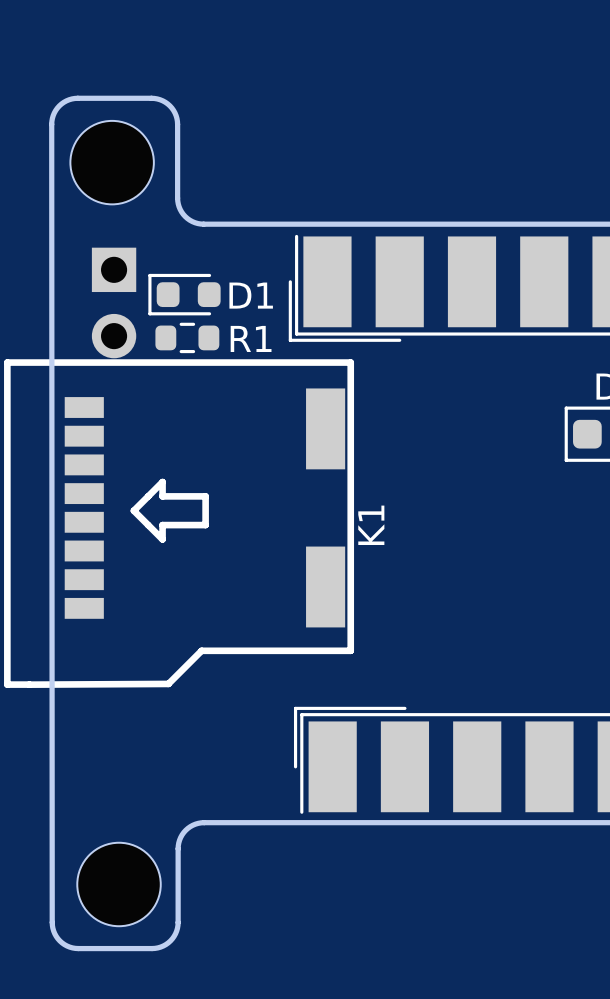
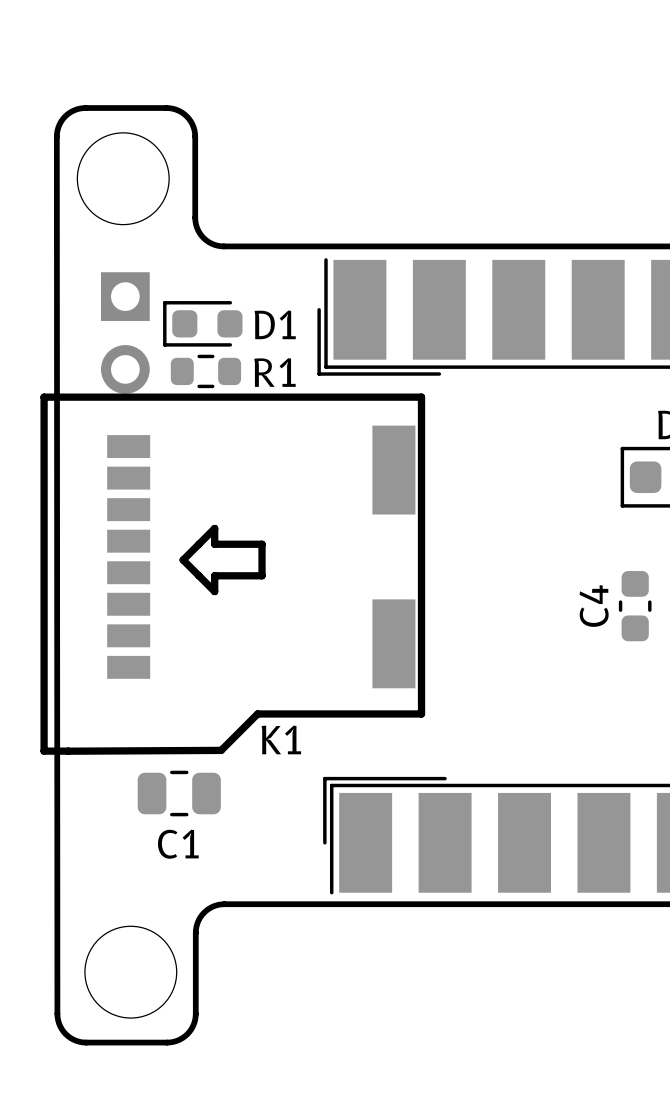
K1 footprint: [4, 359, 355, 688] -> [40, 393, 426, 755]
K1 name position: K1 (371, 525) -> K1 (281, 739)
C4: none -> (635, 606)
C1: none -> (179, 793)

